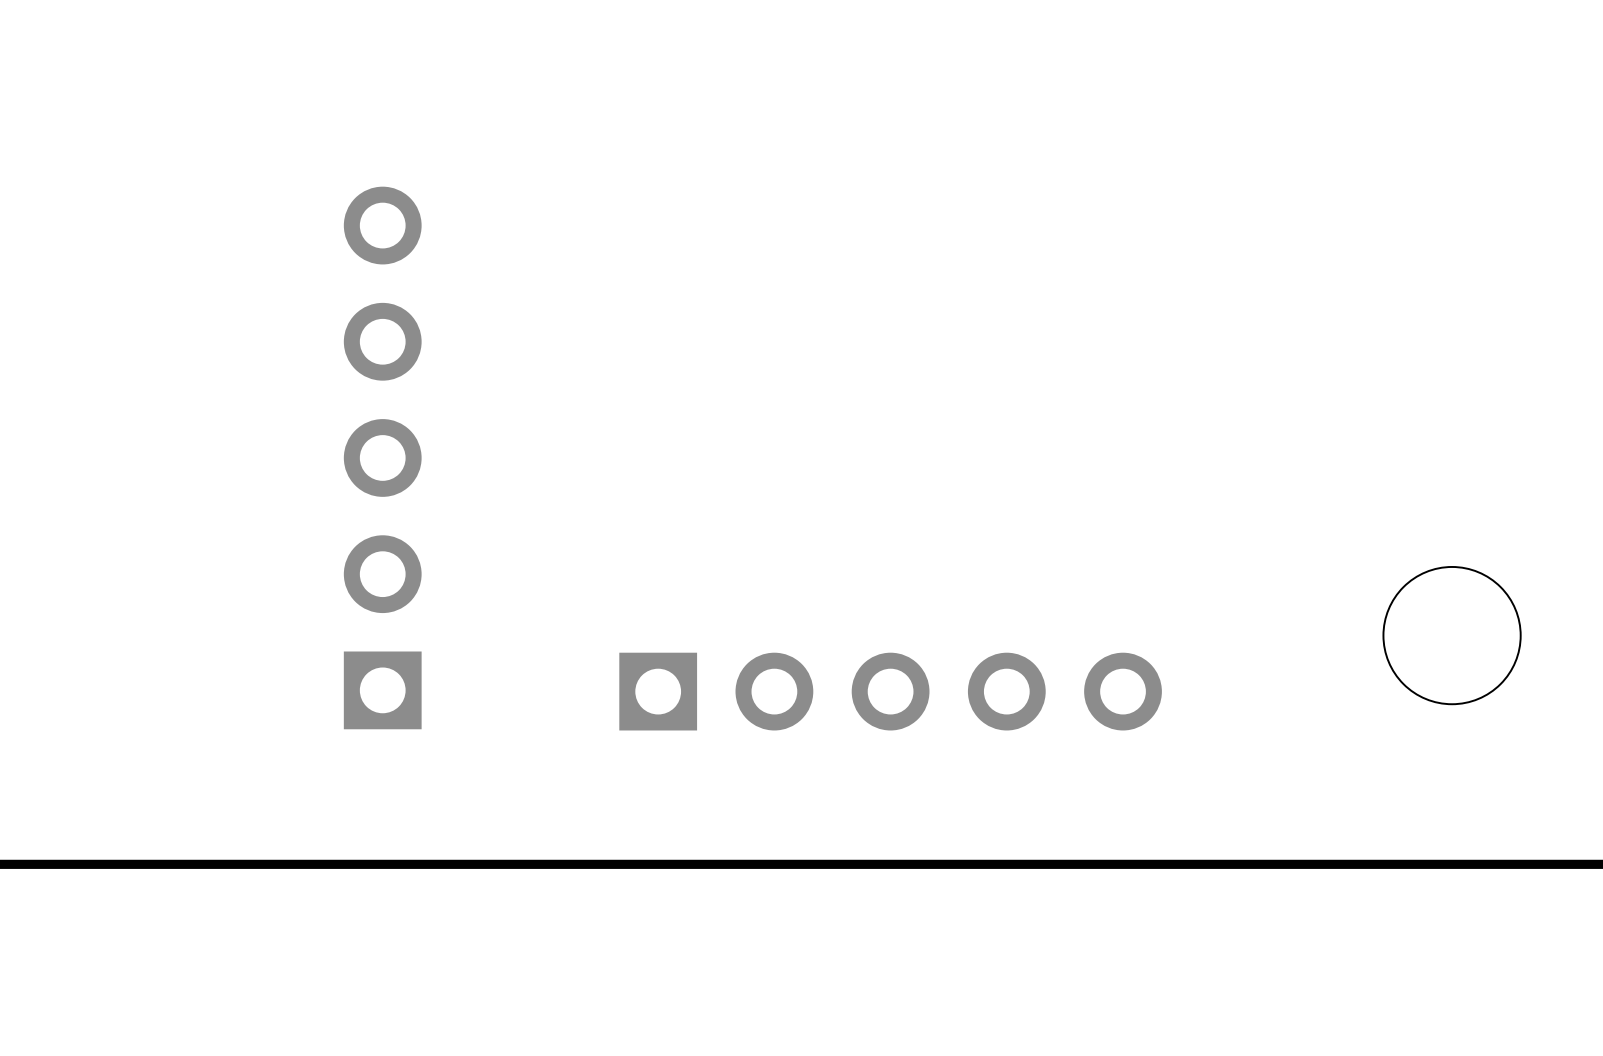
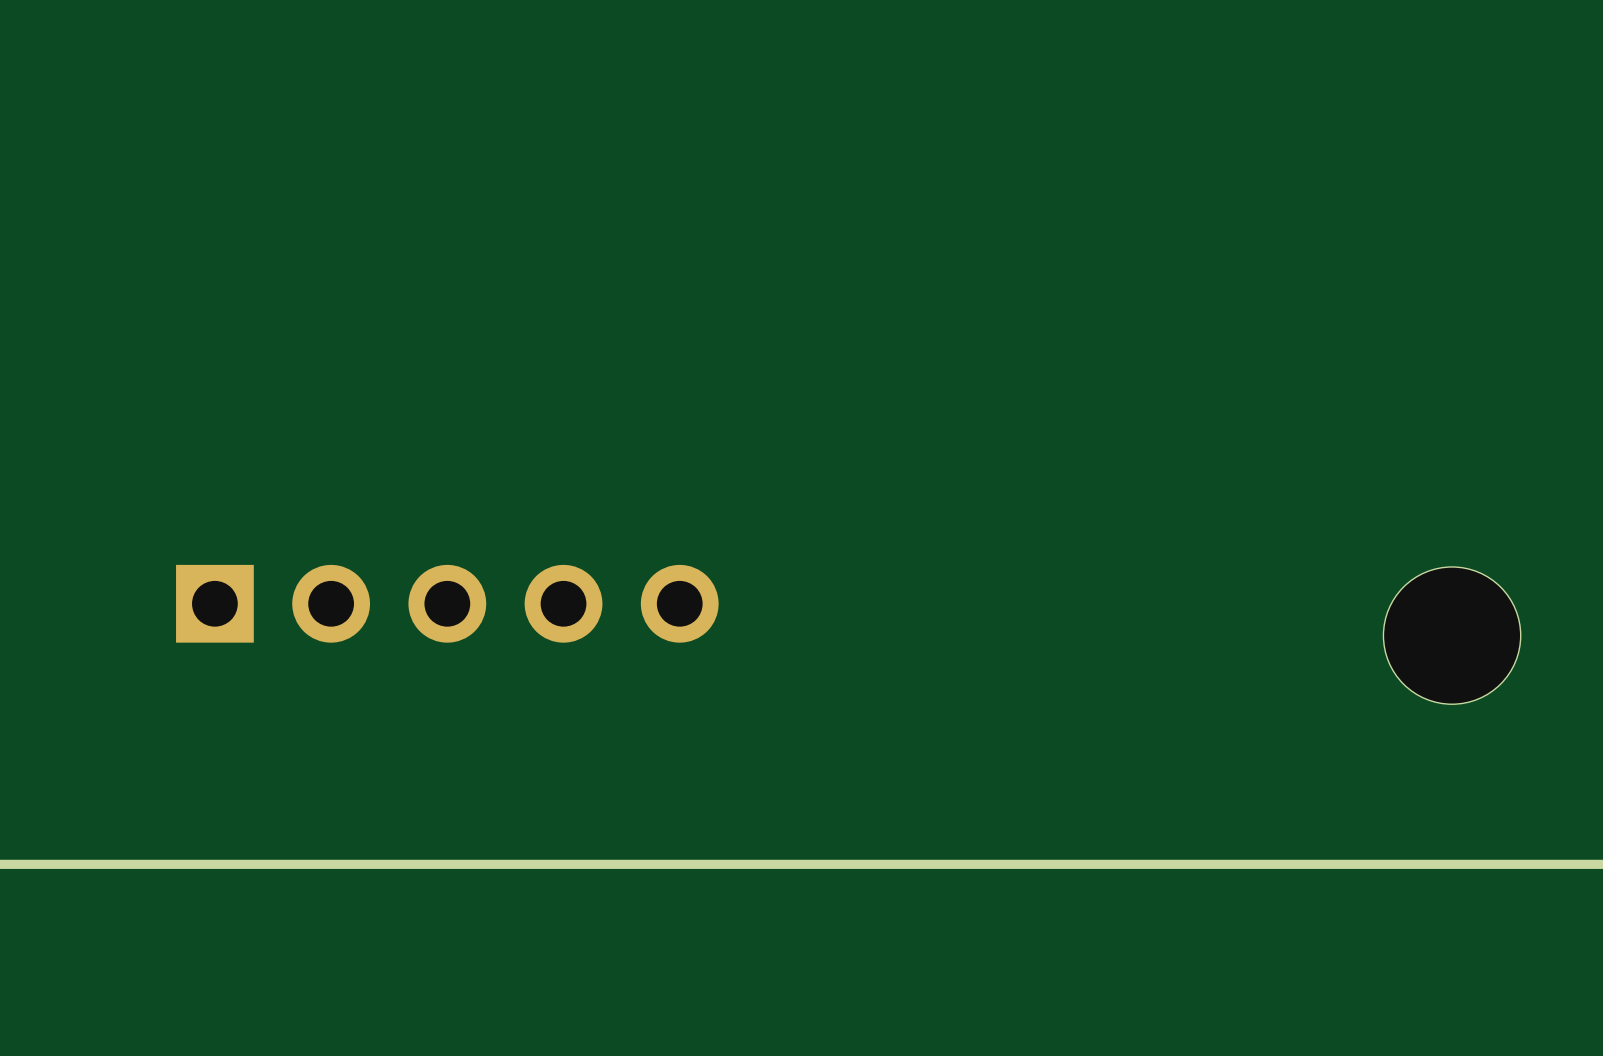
part rotation: 0° (382, 457) -> 90° clockwise (447, 603)
part: (890, 691) -> none

